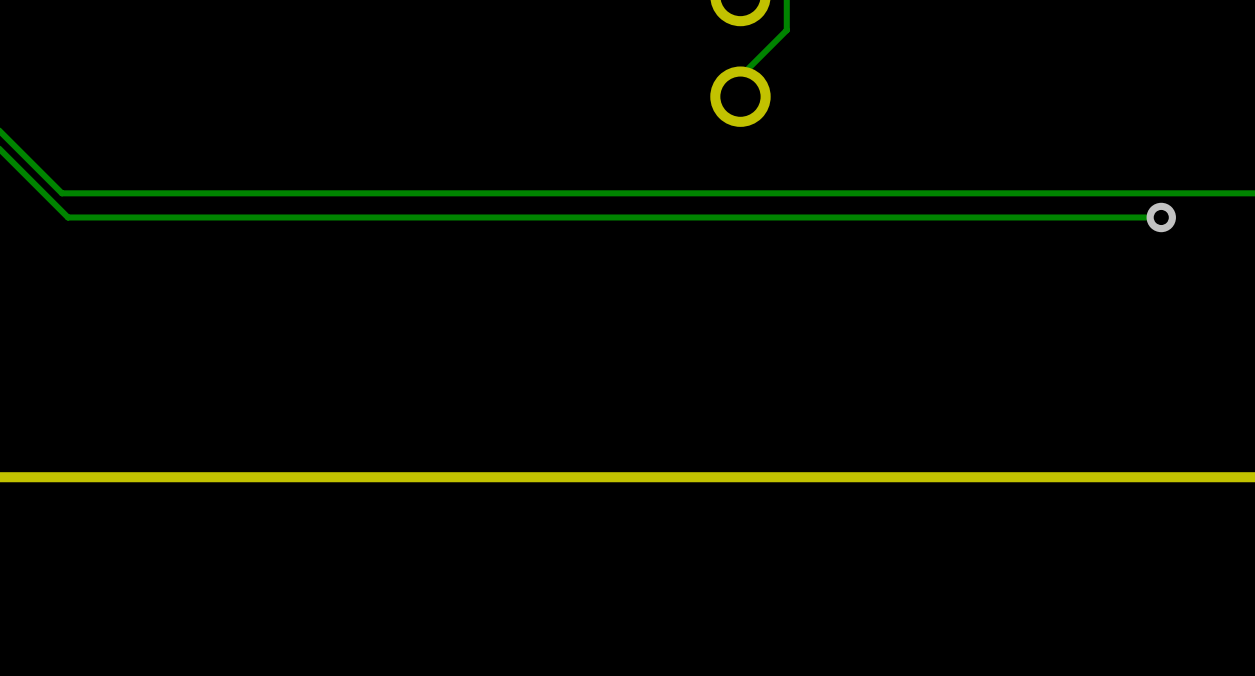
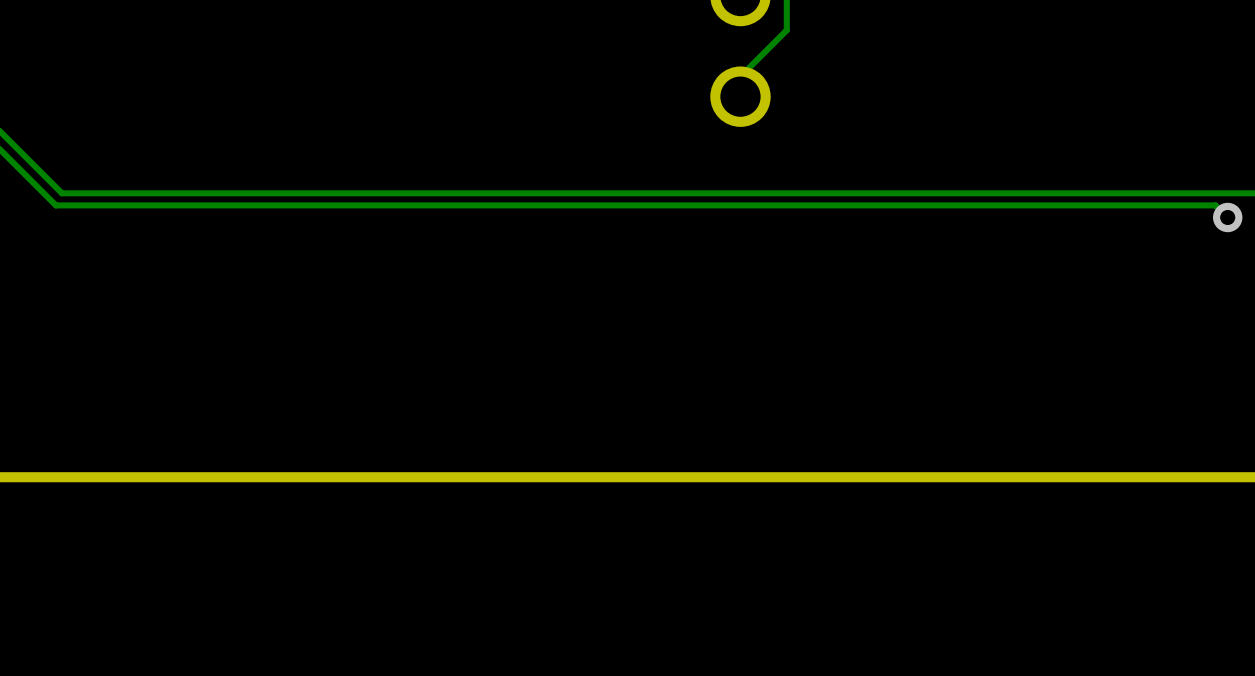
track: (55, 205) (68, 217) (1161, 217) -> (55, 205) (1215, 205) (1227, 217)
via position: (1161, 217) -> (1227, 217)

